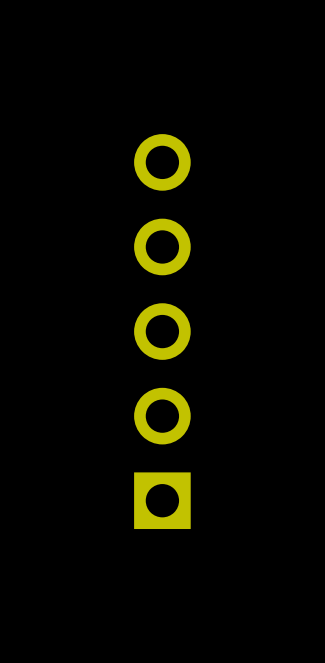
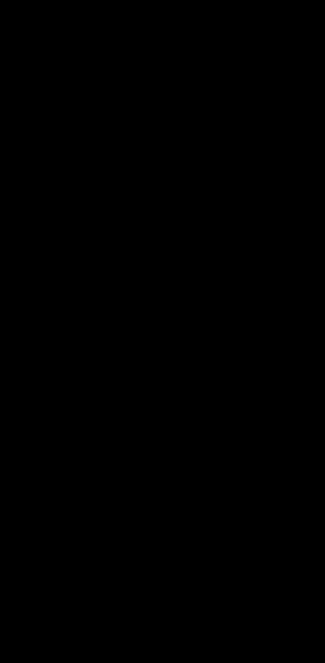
part: (162, 331) -> none

